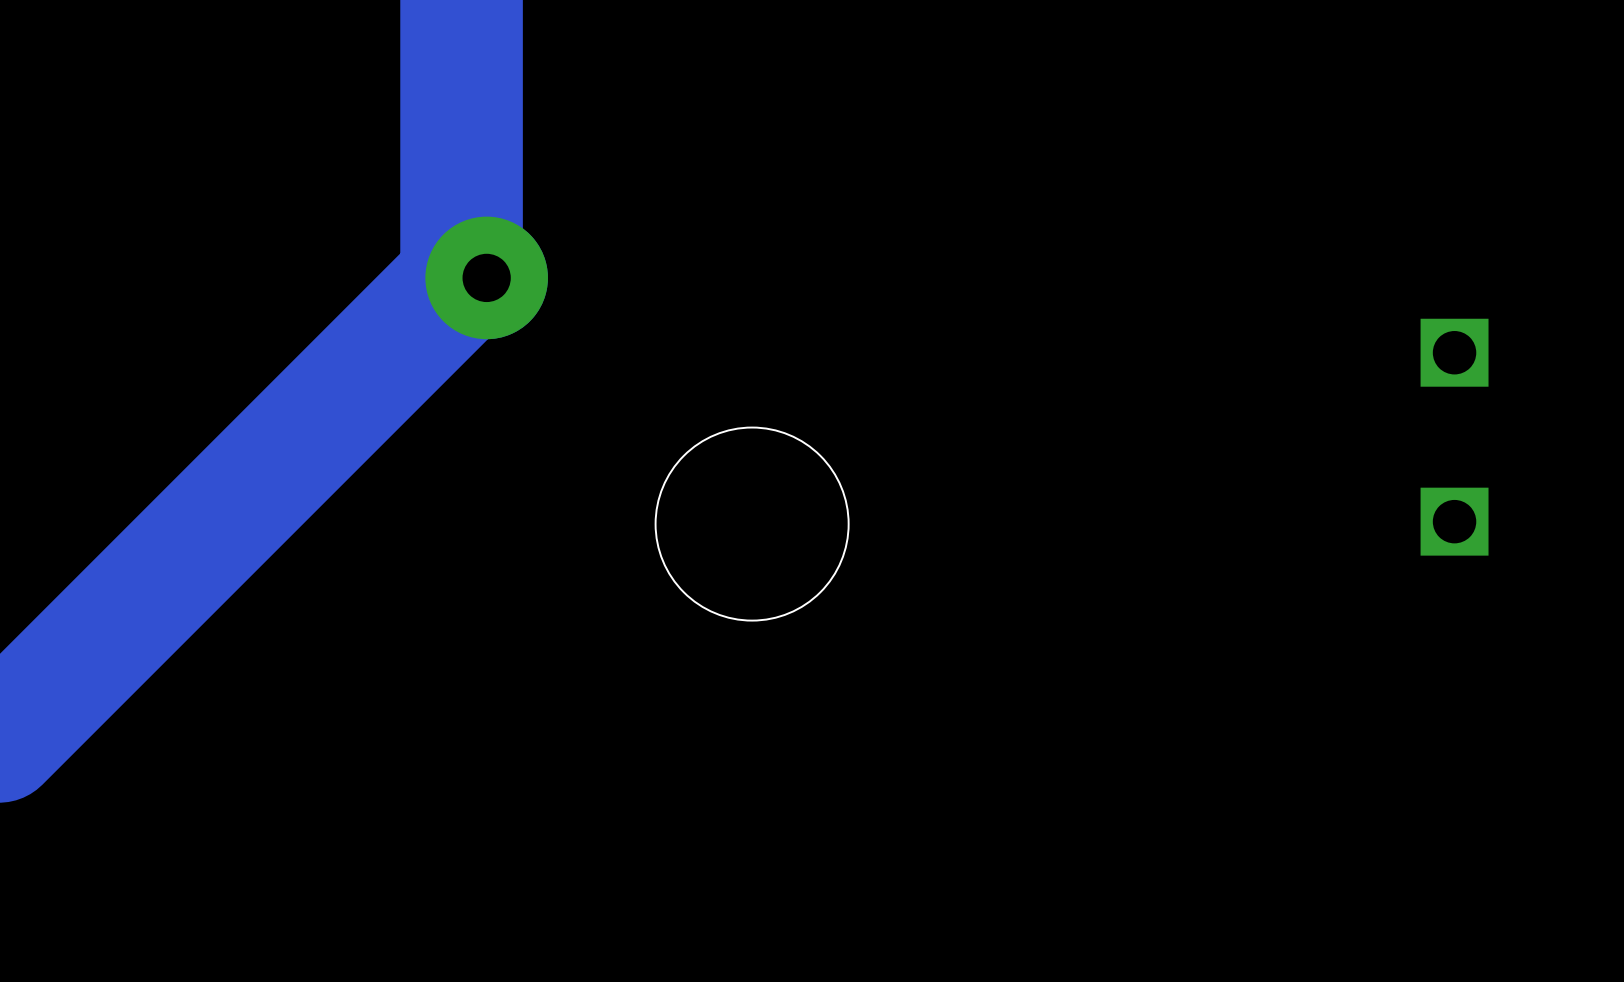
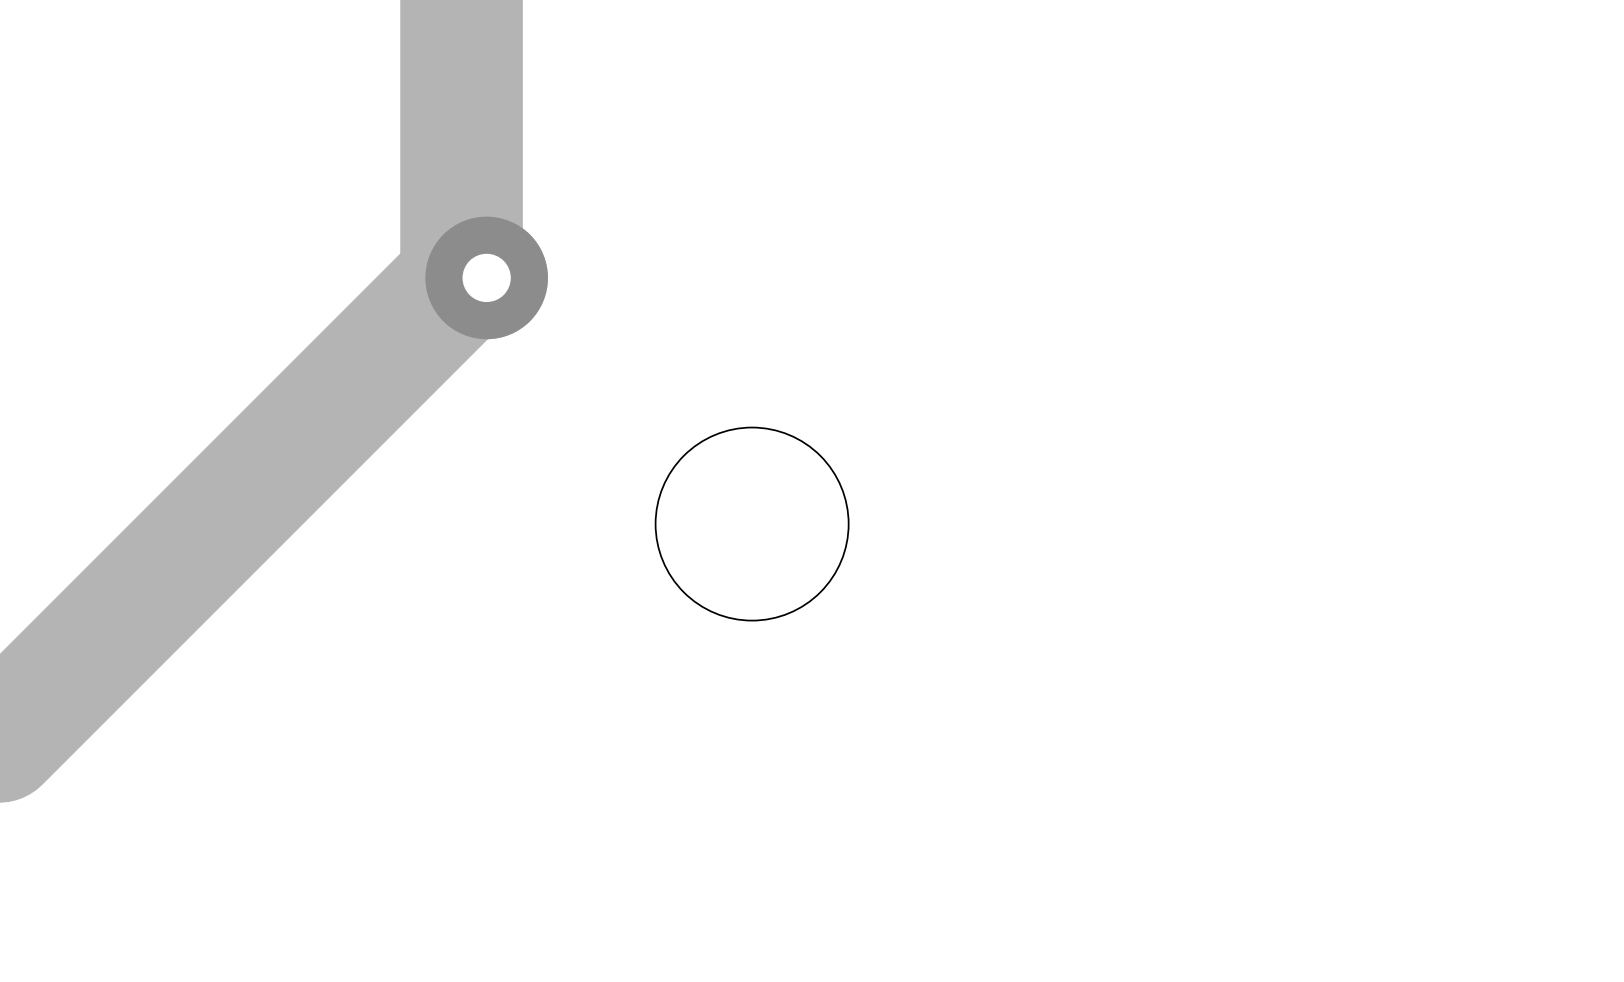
part: (1454, 437) -> none

